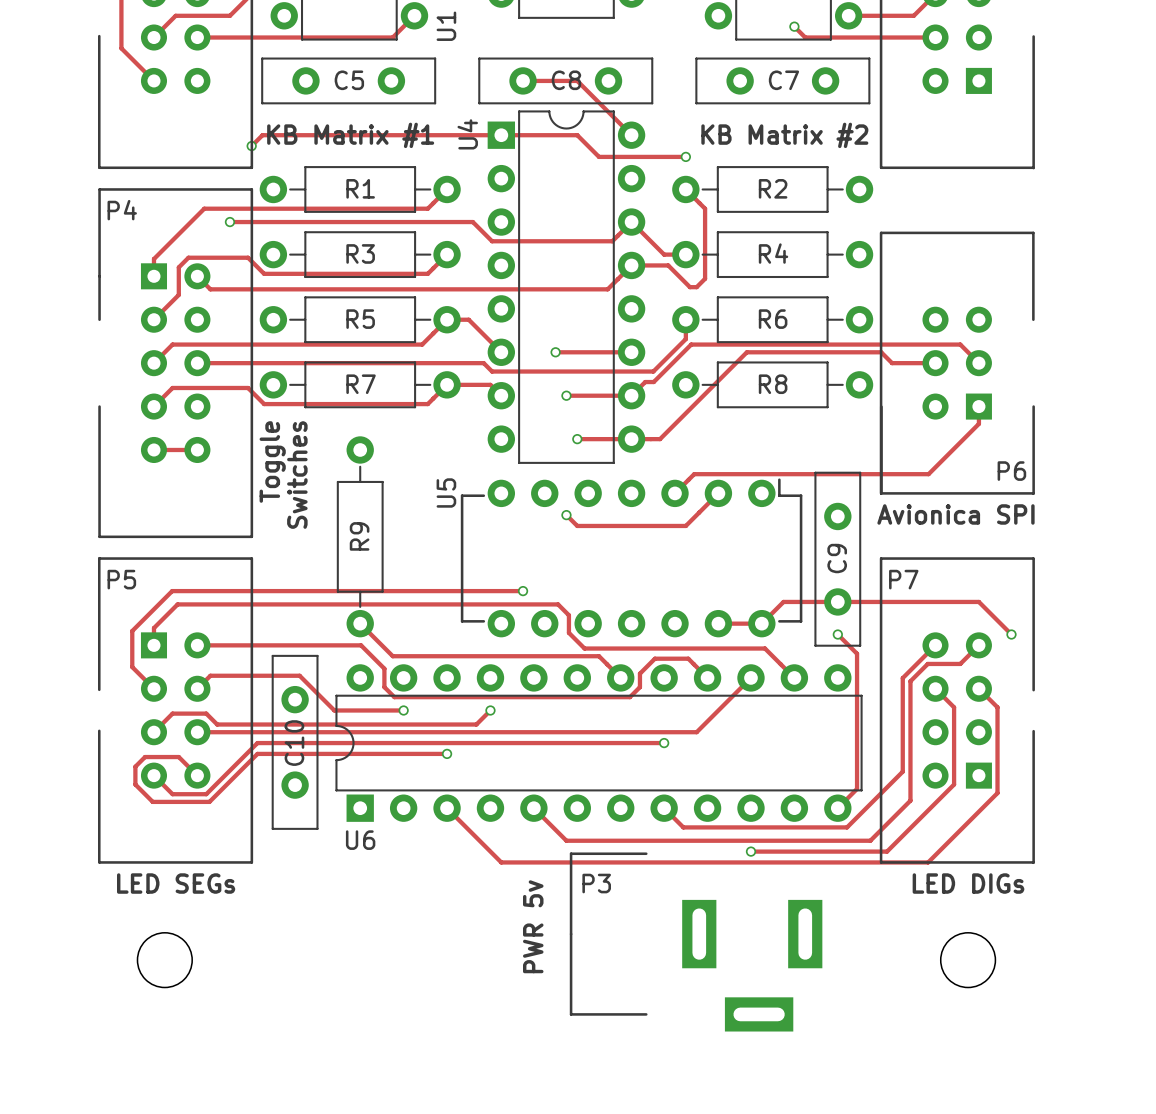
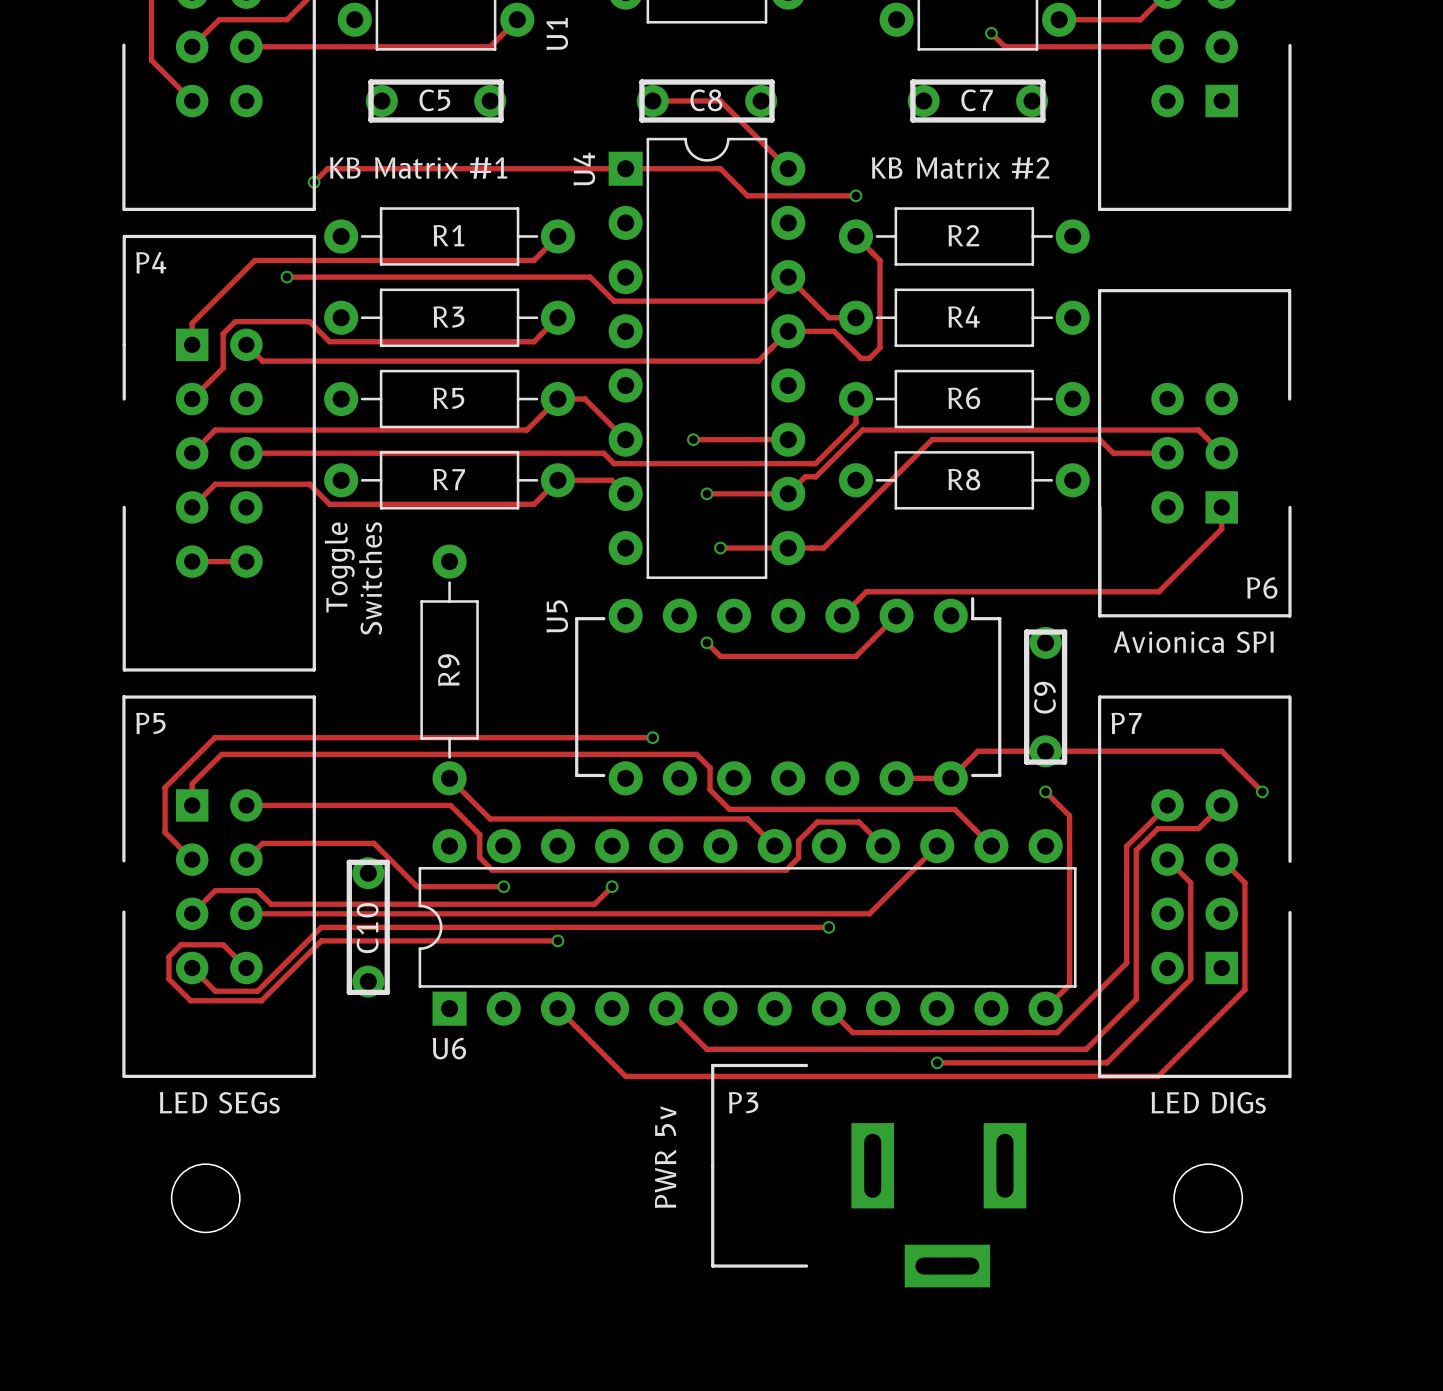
C5 footprint: [261, 57, 437, 105] -> [365, 79, 507, 123]
C8 footprint: [478, 57, 654, 105] -> [636, 79, 778, 123]
C7 footprint: [695, 57, 871, 105] -> [907, 79, 1049, 123]
C9 footprint: [814, 471, 862, 647] -> [1024, 626, 1068, 768]
C10 footprint: [271, 654, 319, 830] -> [346, 857, 390, 998]

